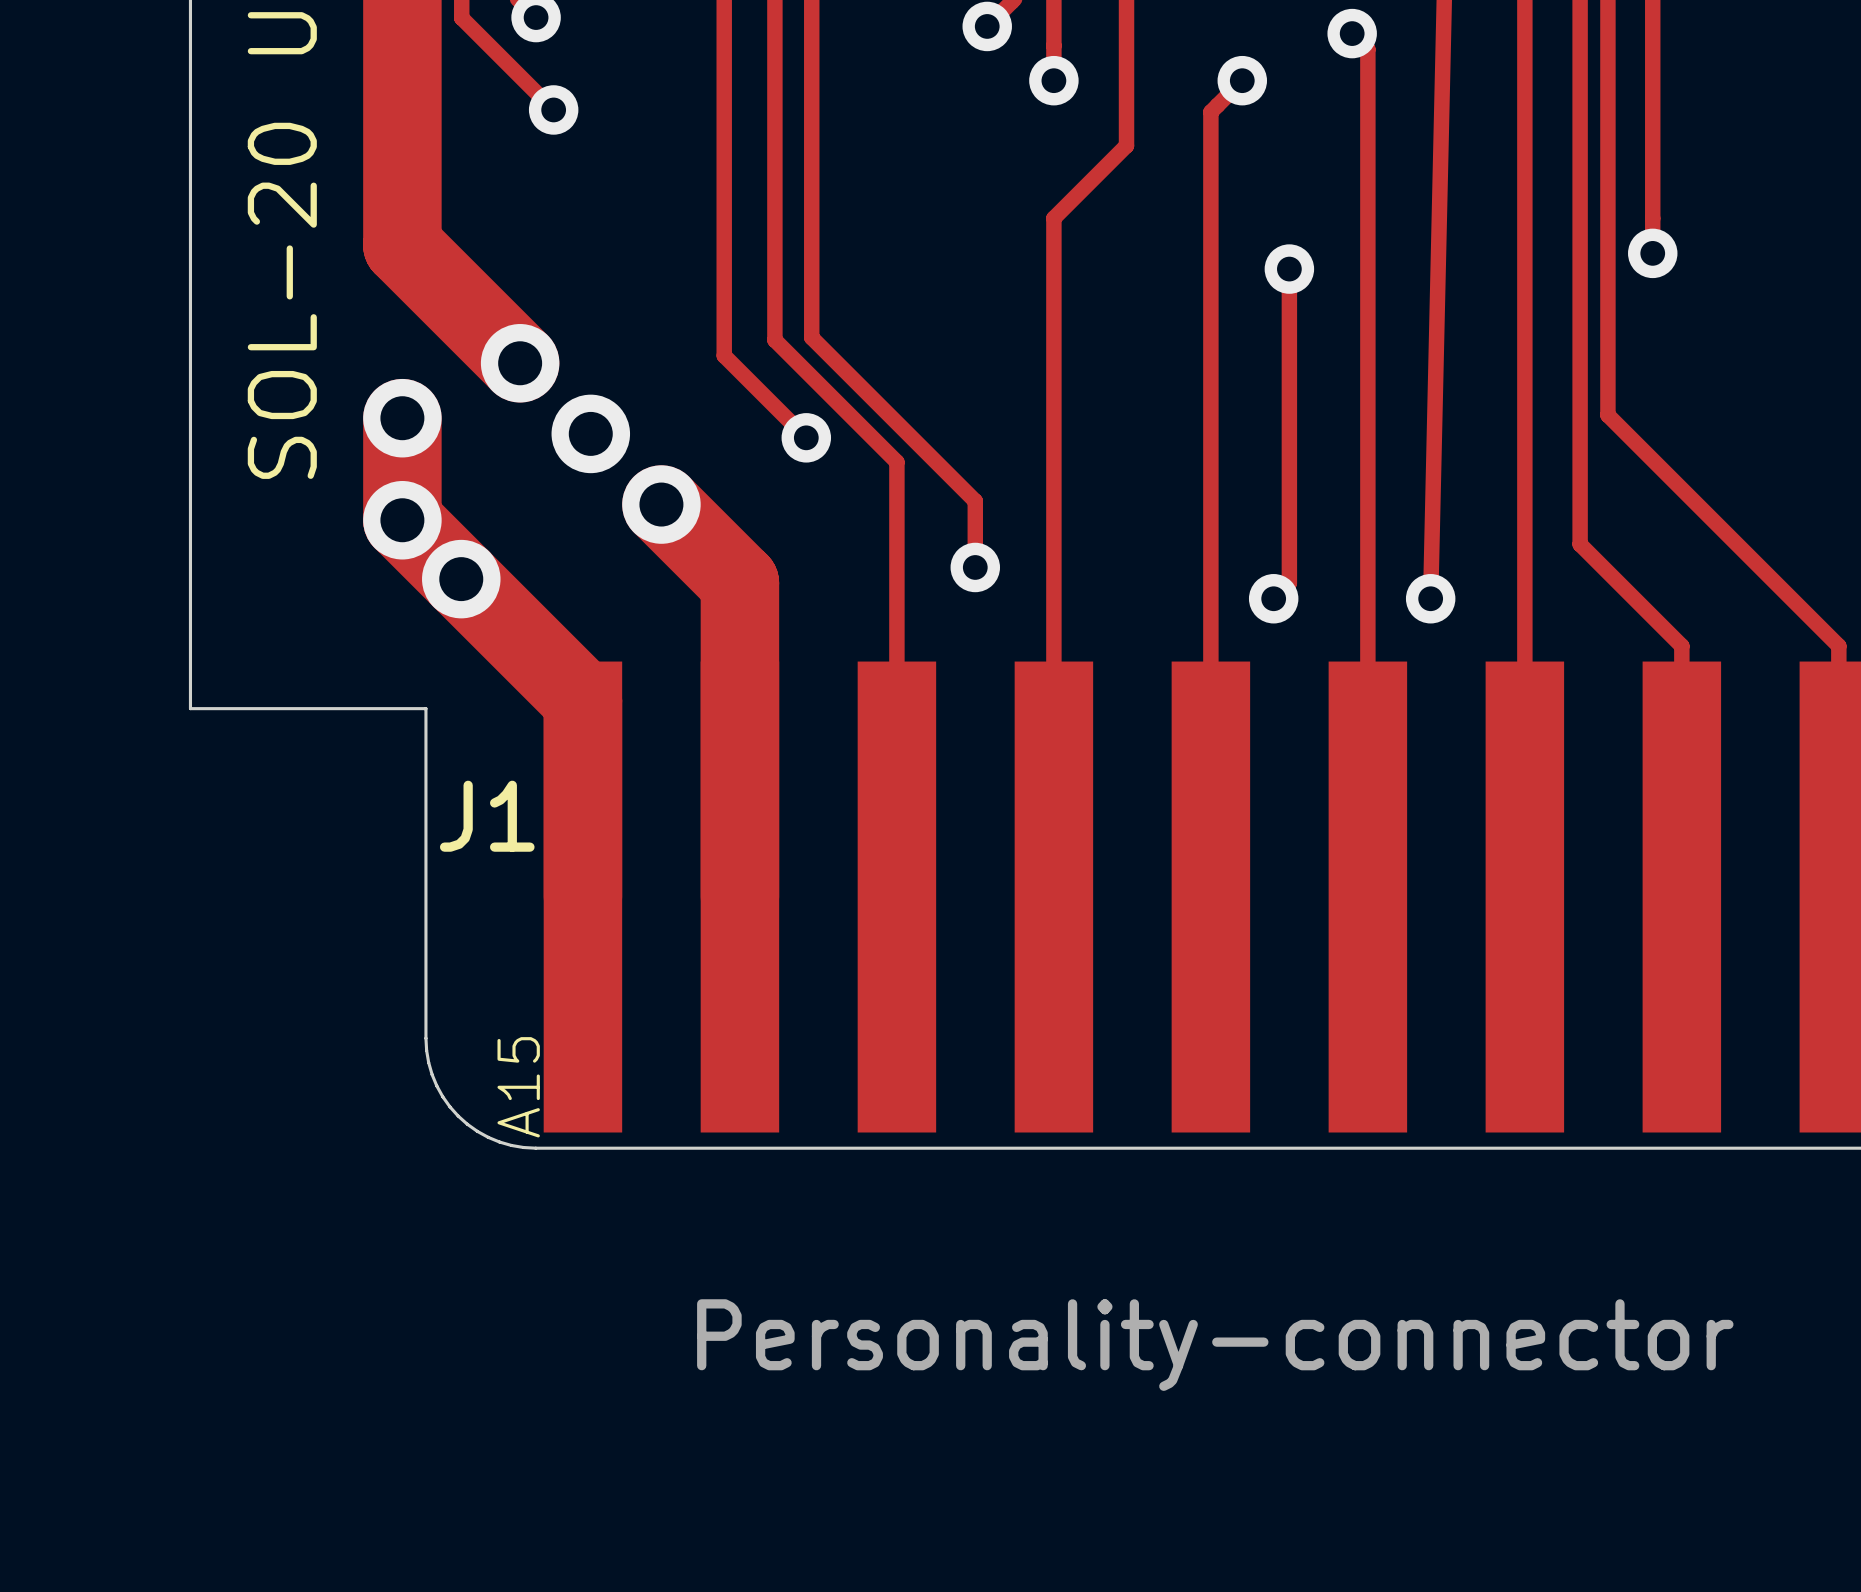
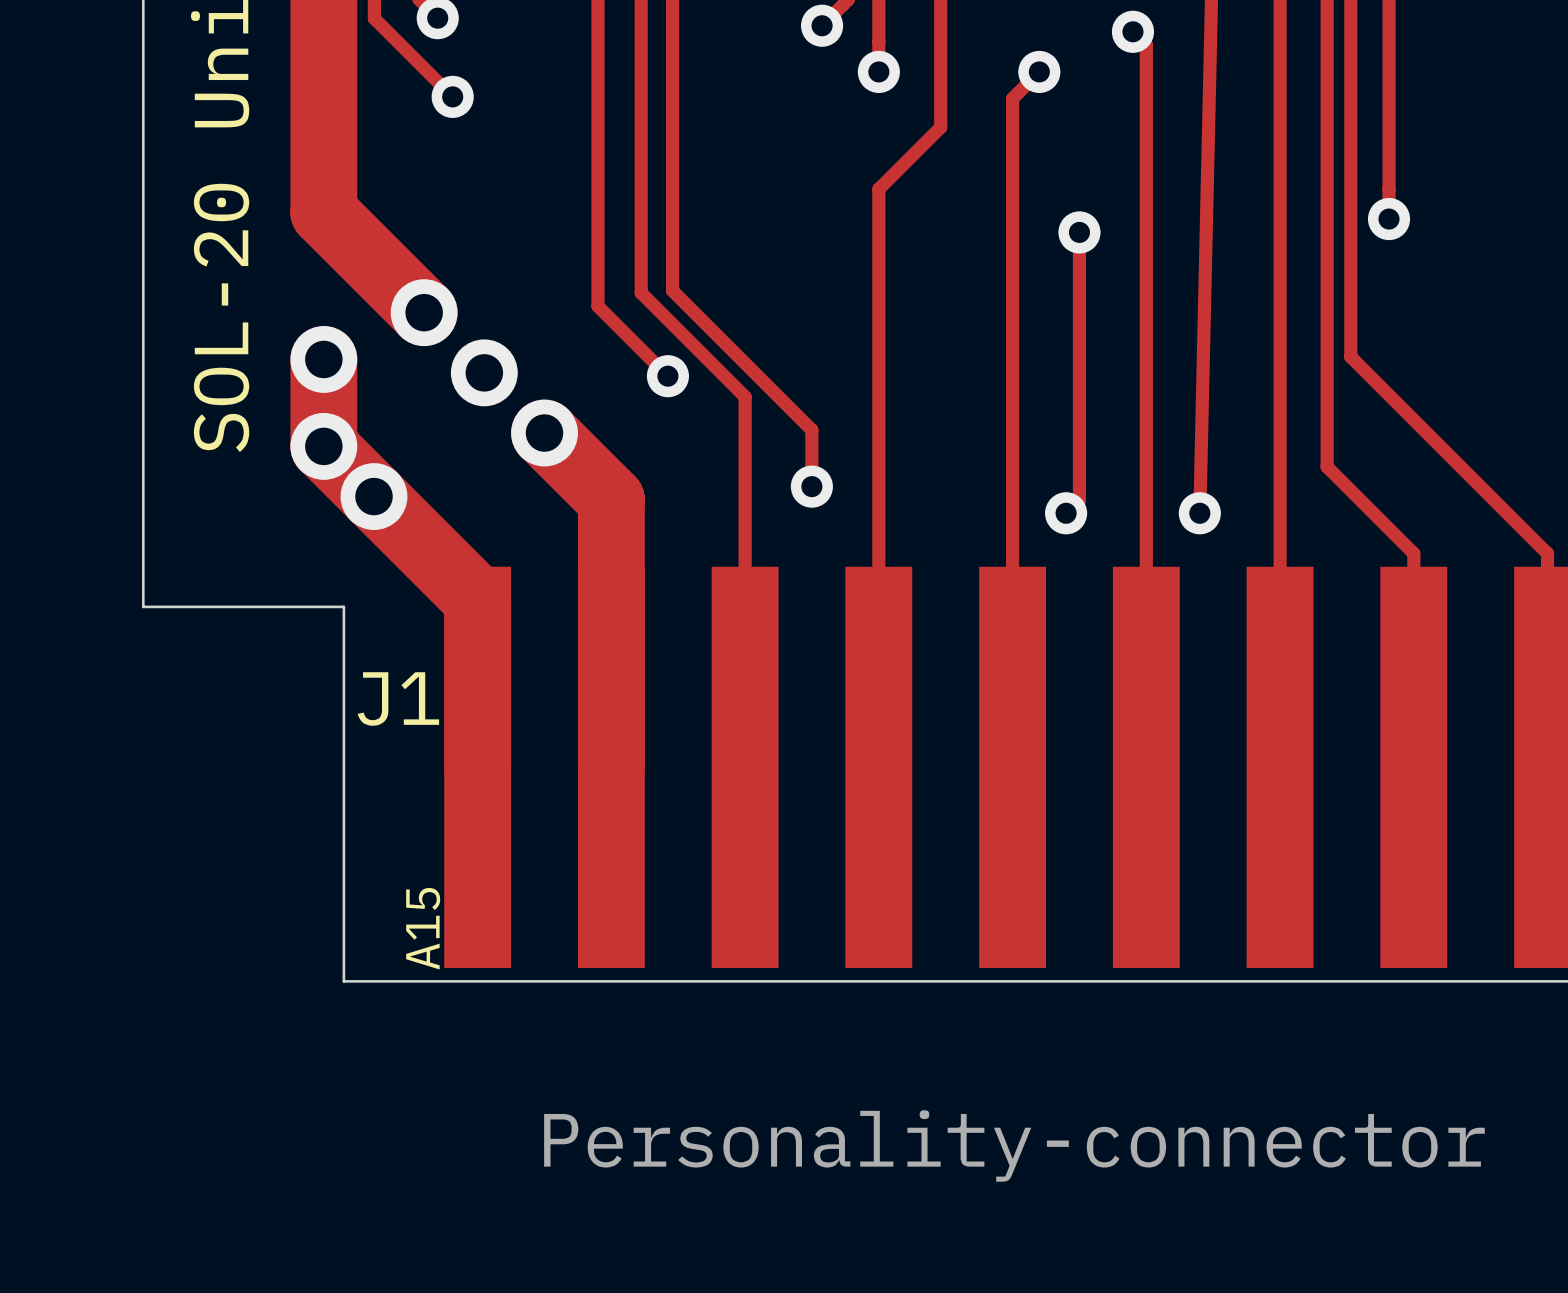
board edge: (425, 1038) (428, 1062) (436, 1085) (458, 1116) (477, 1131) (499, 1142) (535, 1148) -> (343, 887) (343, 981) (437, 981)

